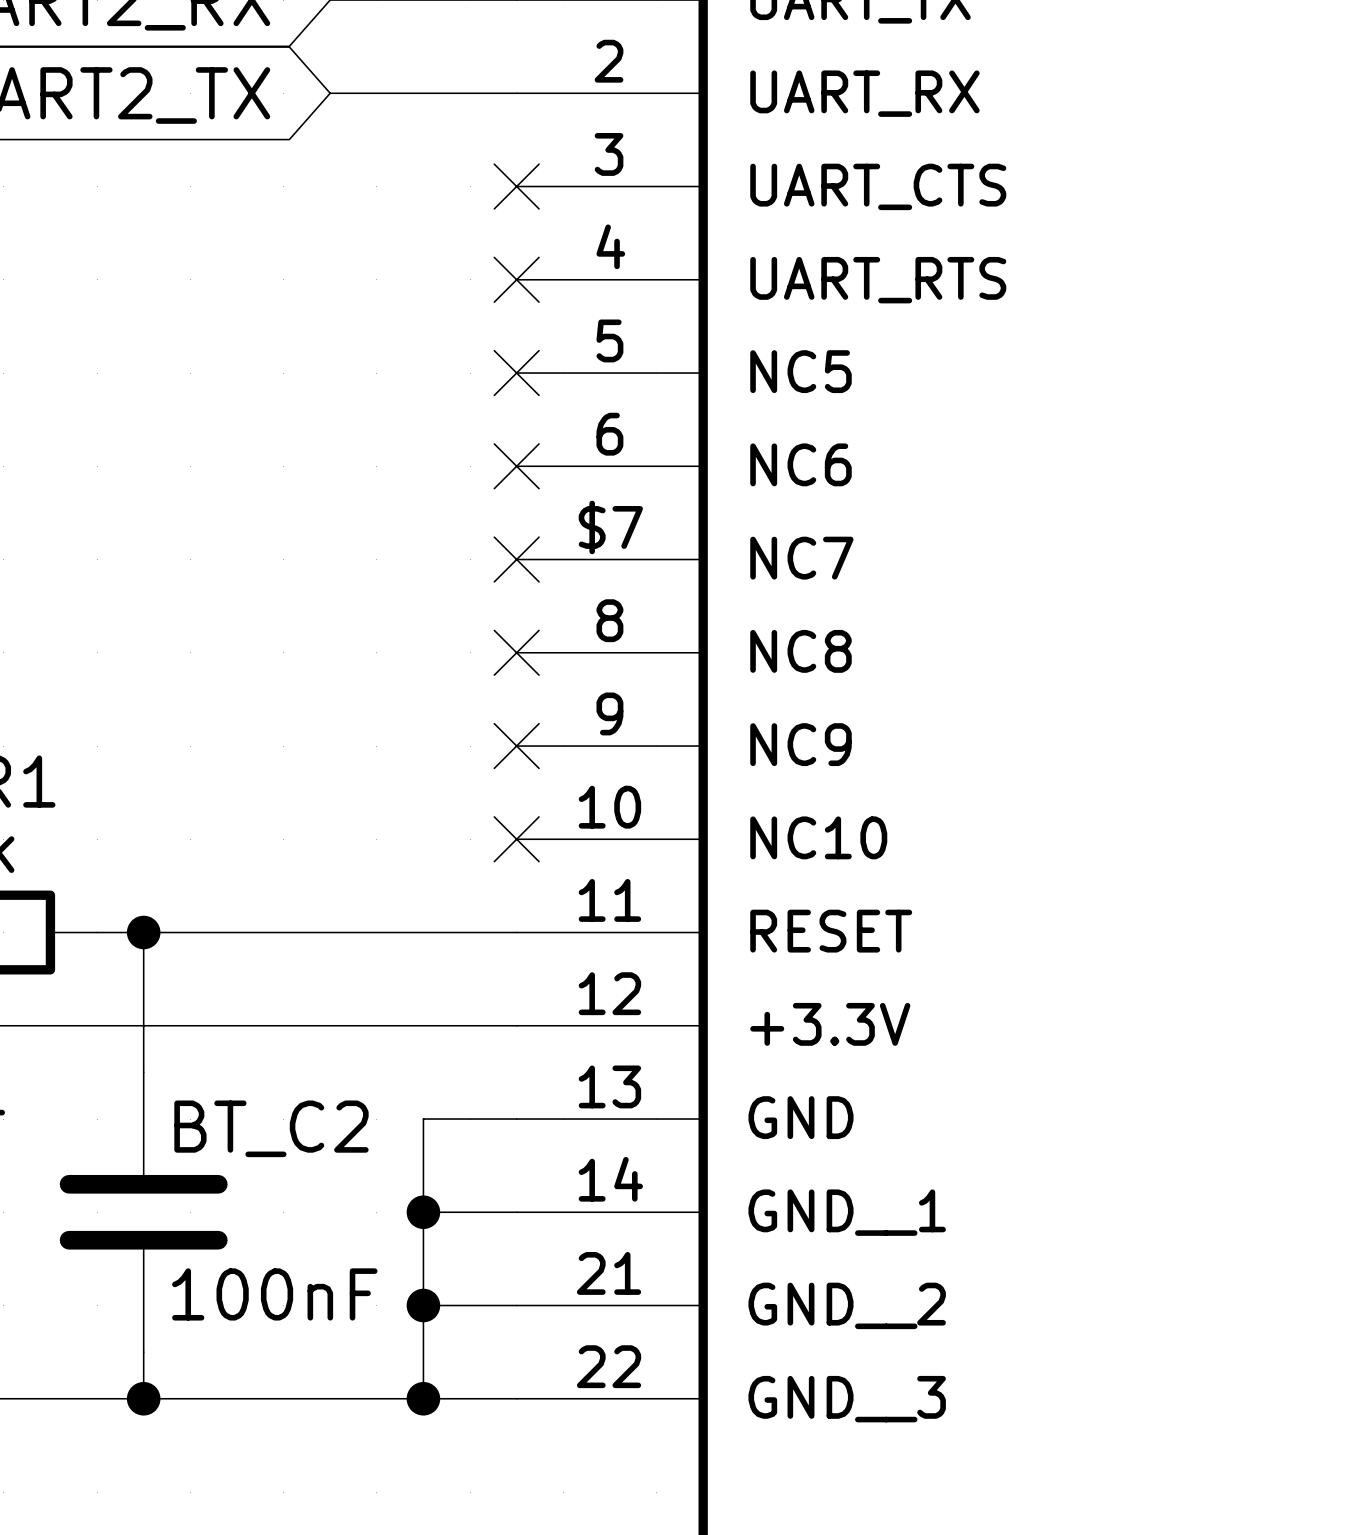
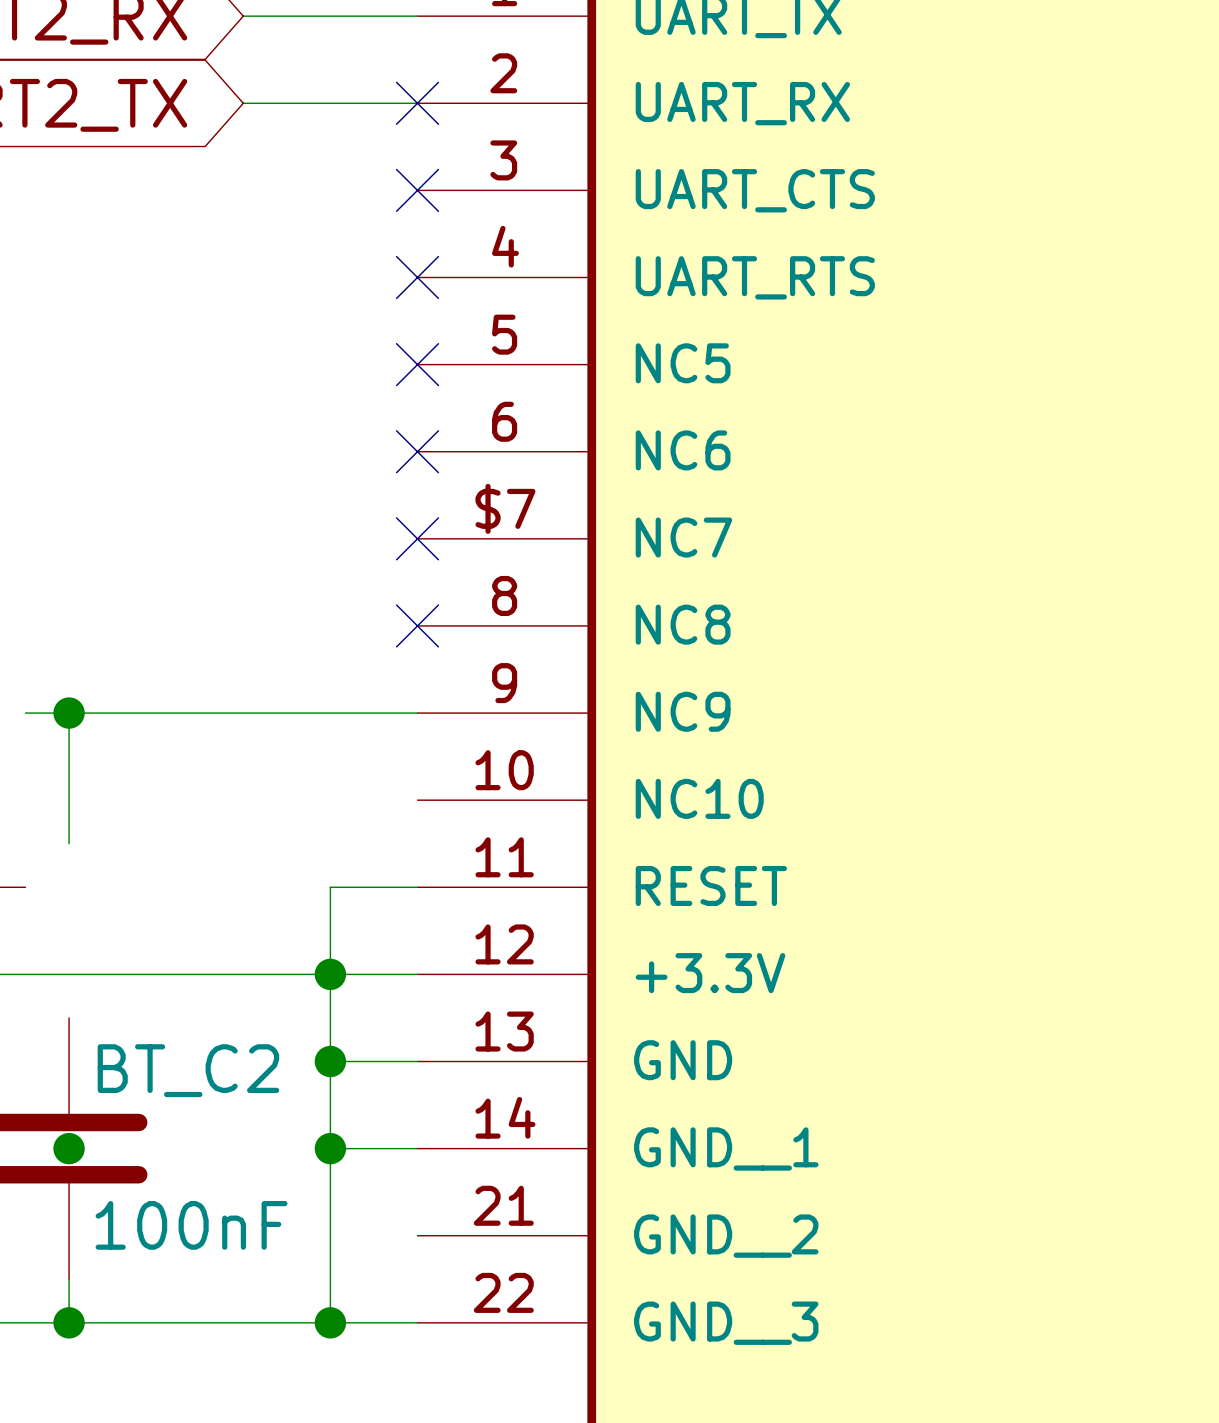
no-connect mark: none -> (417, 103)
wire: none -> (25, 713) (417, 713)
junction: none -> (69, 713)
no-connect mark: (516, 746) -> none
no-connect mark: (516, 839) -> none
wire: (97, 932) (423, 932) -> (330, 1061) (330, 887)
wire: (143, 932) (143, 1072) -> (69, 713) (69, 843)
junction: (143, 932) -> none
junction: none -> (330, 974)
junction: none -> (330, 1061)
junction: none -> (69, 1148)
wire: (423, 1305) (516, 1305) -> none
junction: (423, 1305) -> none

